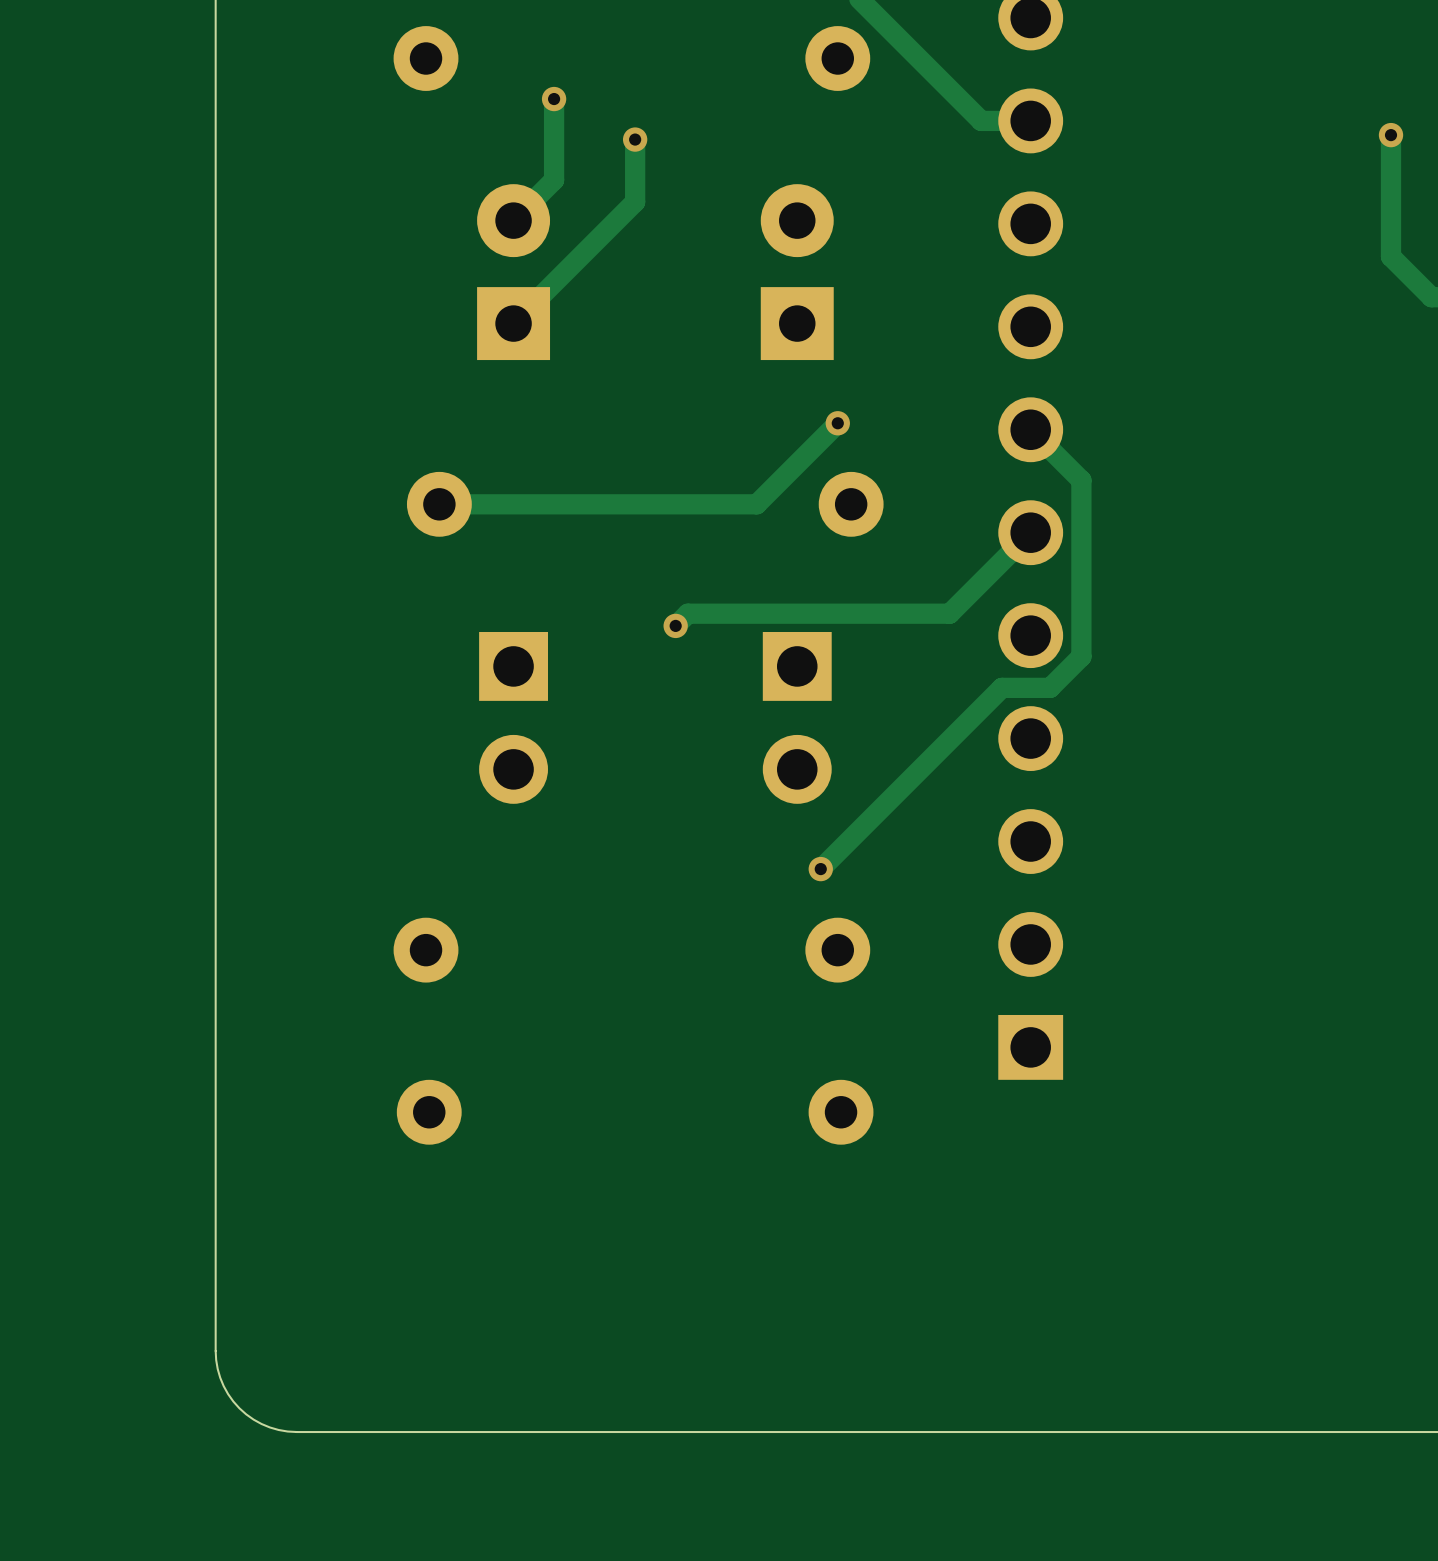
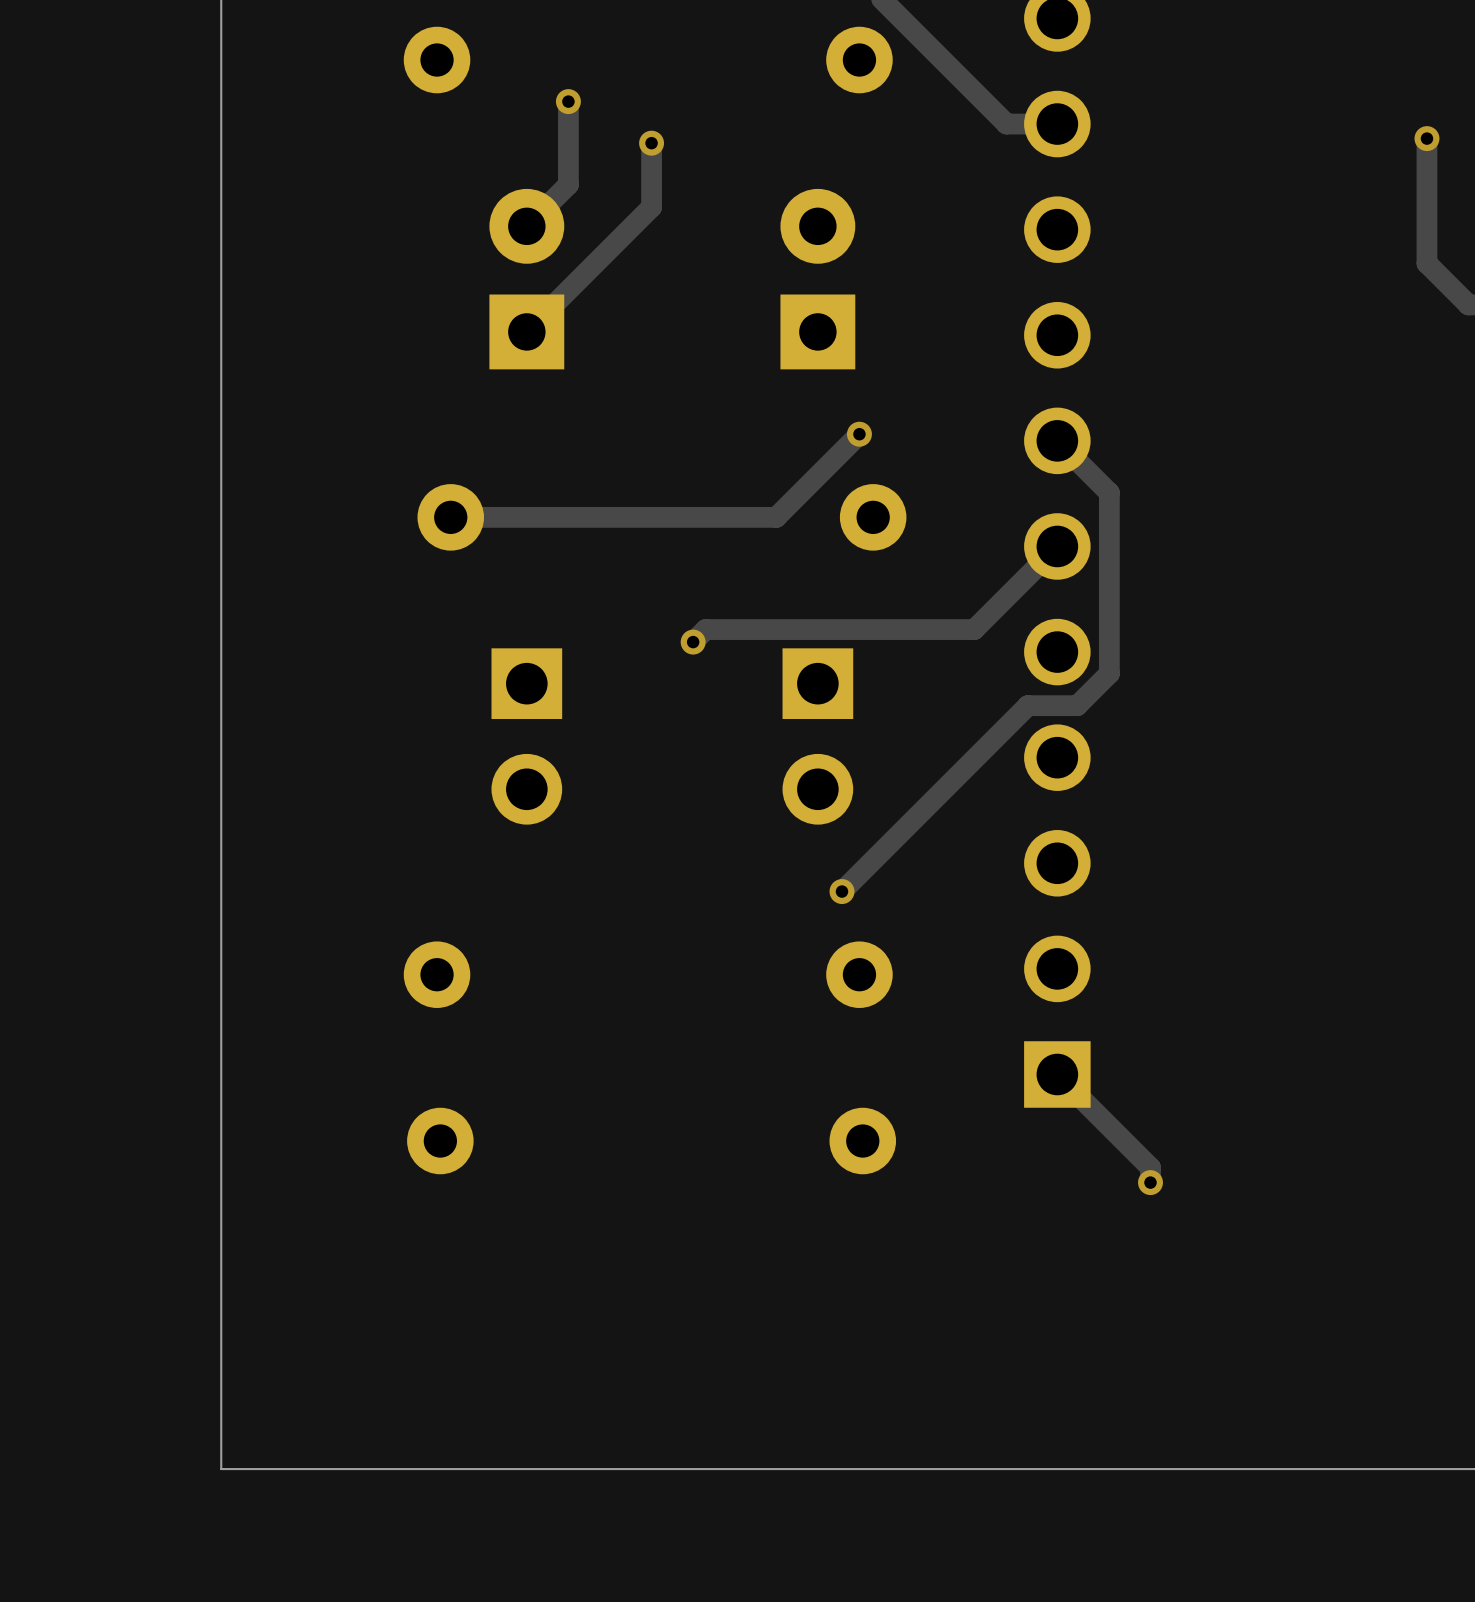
track: none -> (1057, 1074) (1150, 1167) (1150, 1182)
via: none -> (1150, 1182)
board edge: (215, 1350) (220, 1377) (228, 1394) (239, 1408) (253, 1419) (269, 1427) (296, 1432) -> (221, 1385) (221, 1469) (304, 1469)

